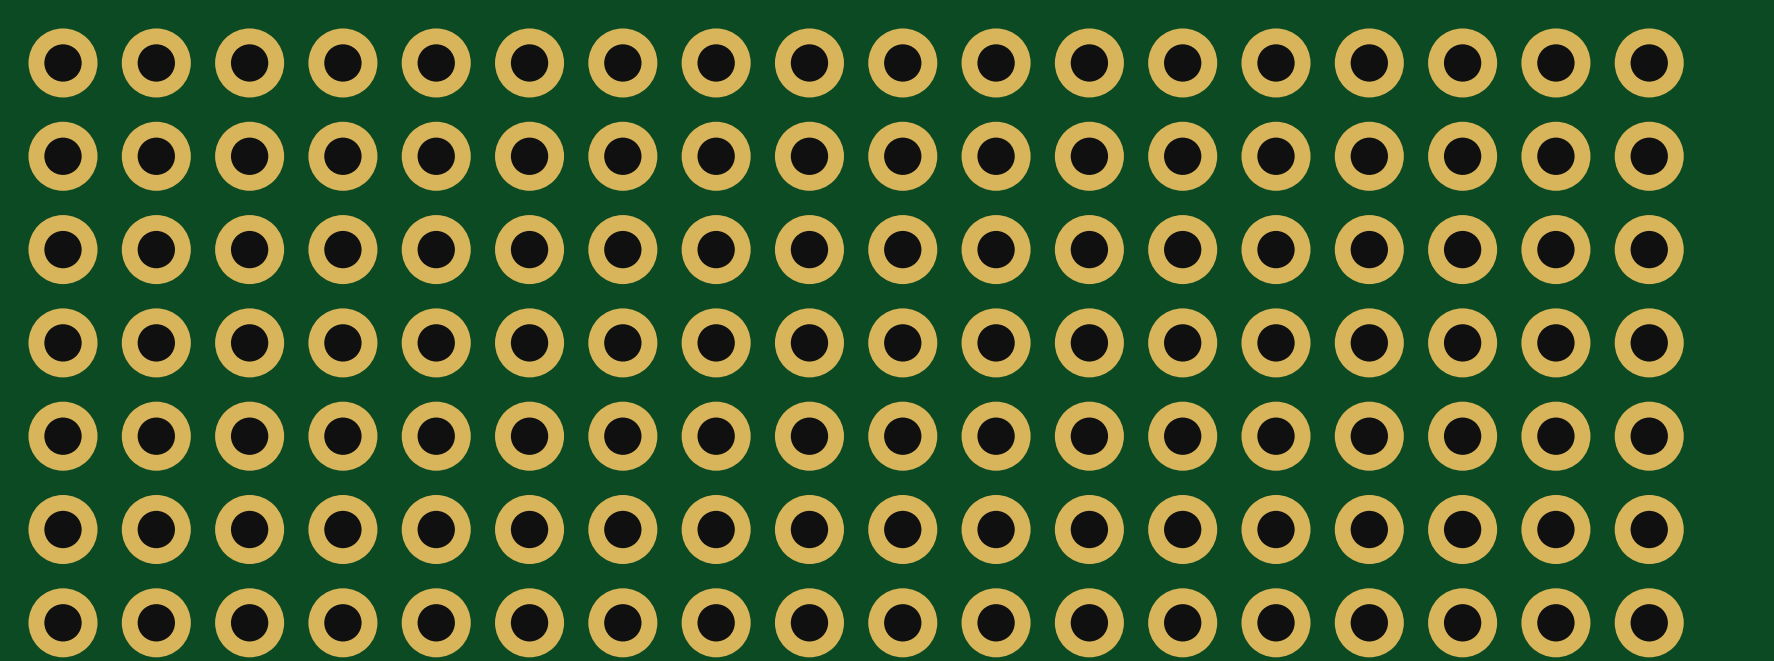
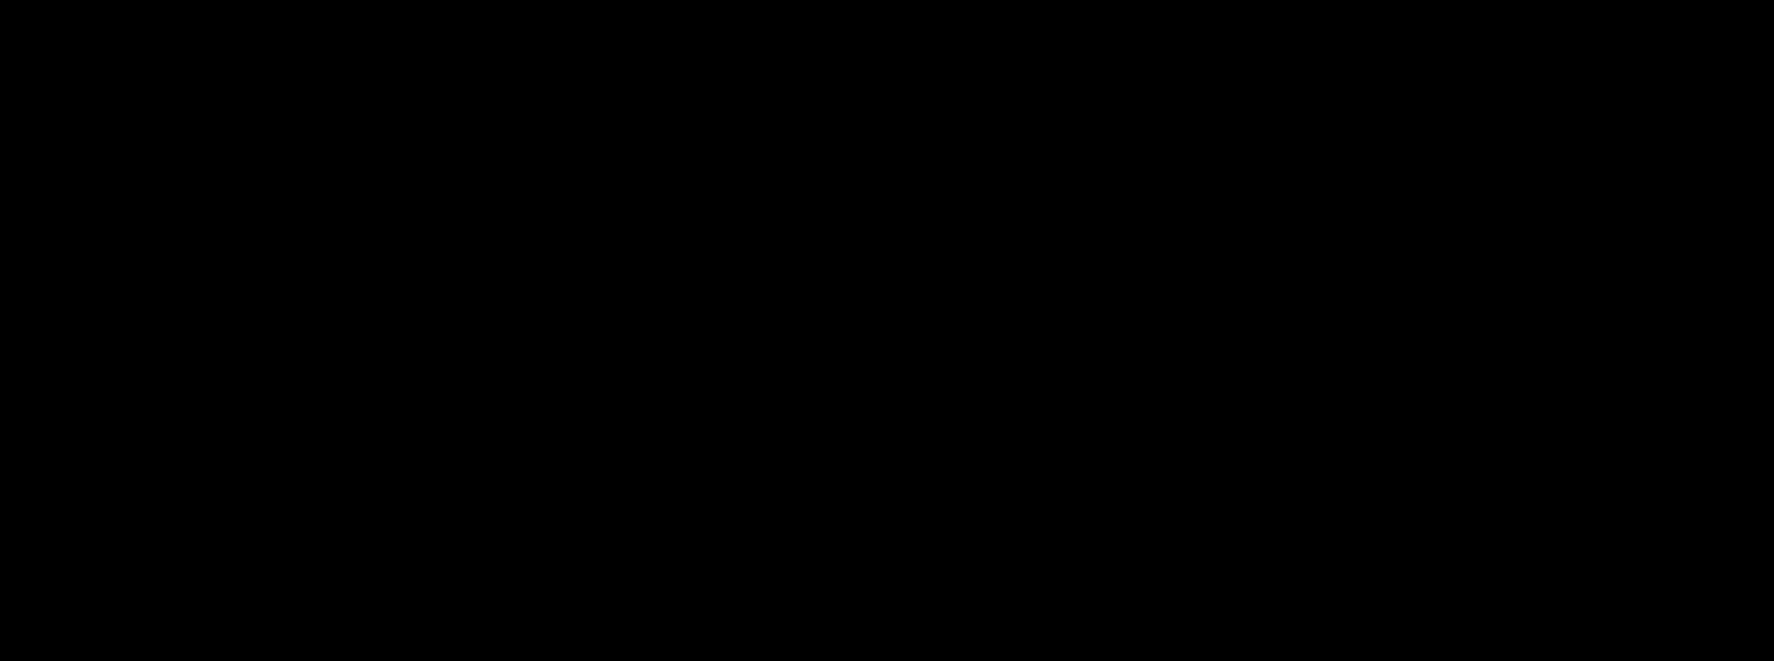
part: (856, 62) -> none
part: (856, 156) -> none
part: (856, 249) -> none
part: (856, 342) -> none
part: (856, 436) -> none
part: (856, 529) -> none
part: (856, 622) -> none

